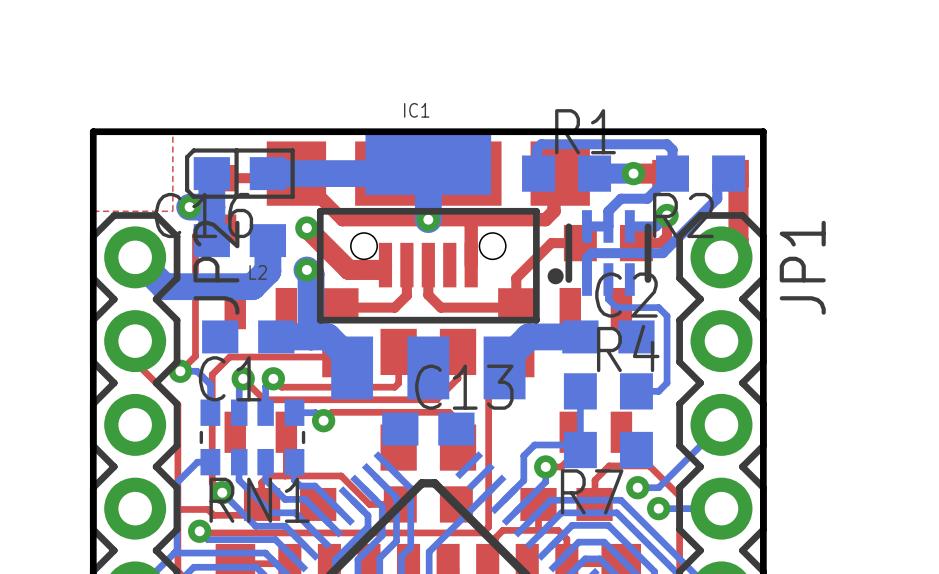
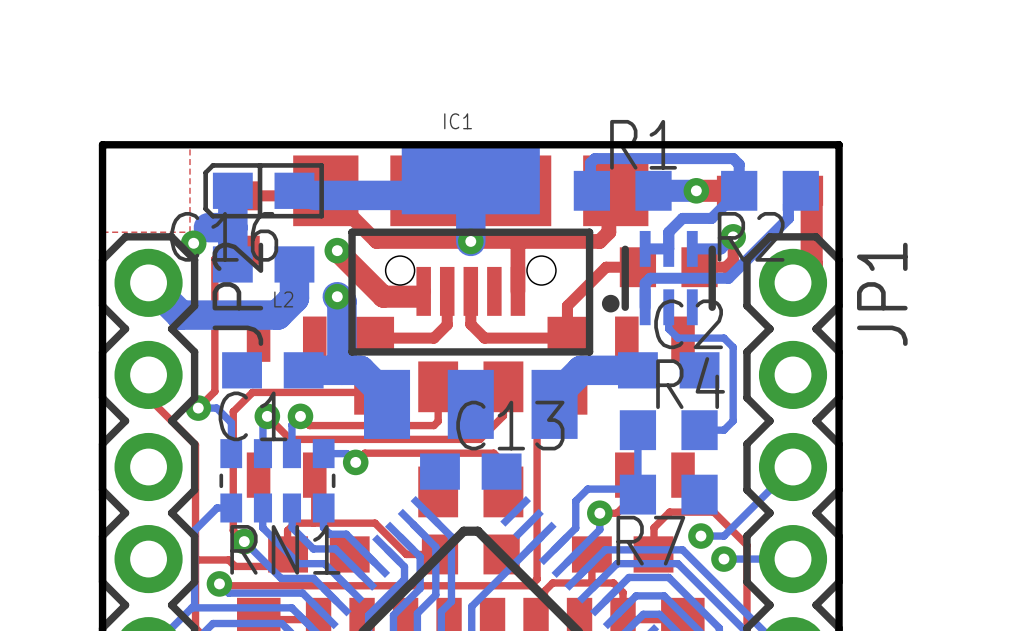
bottom track: (418, 173) (267, 173) -> (459, 190) (455, 195) (314, 195)
via position: (189, 207) -> (193, 243)

